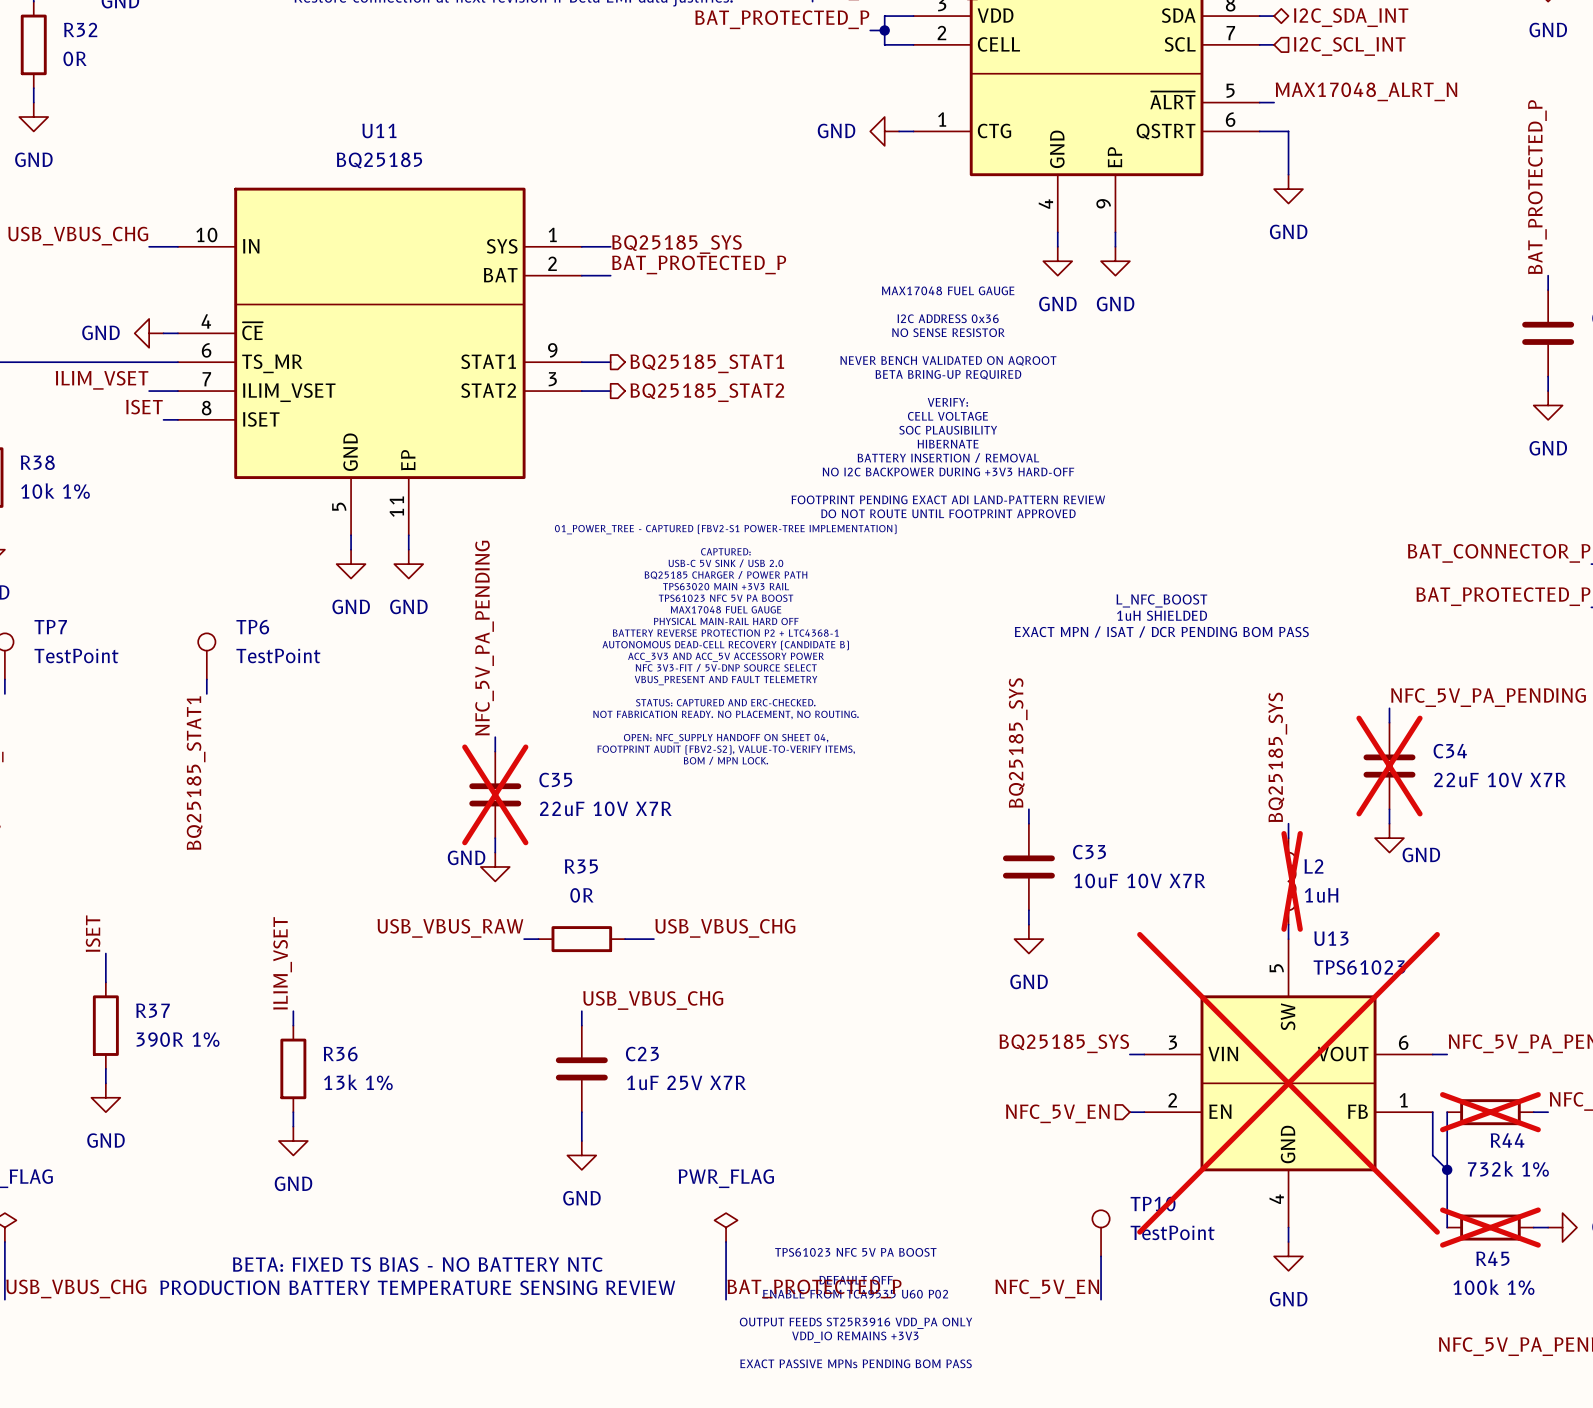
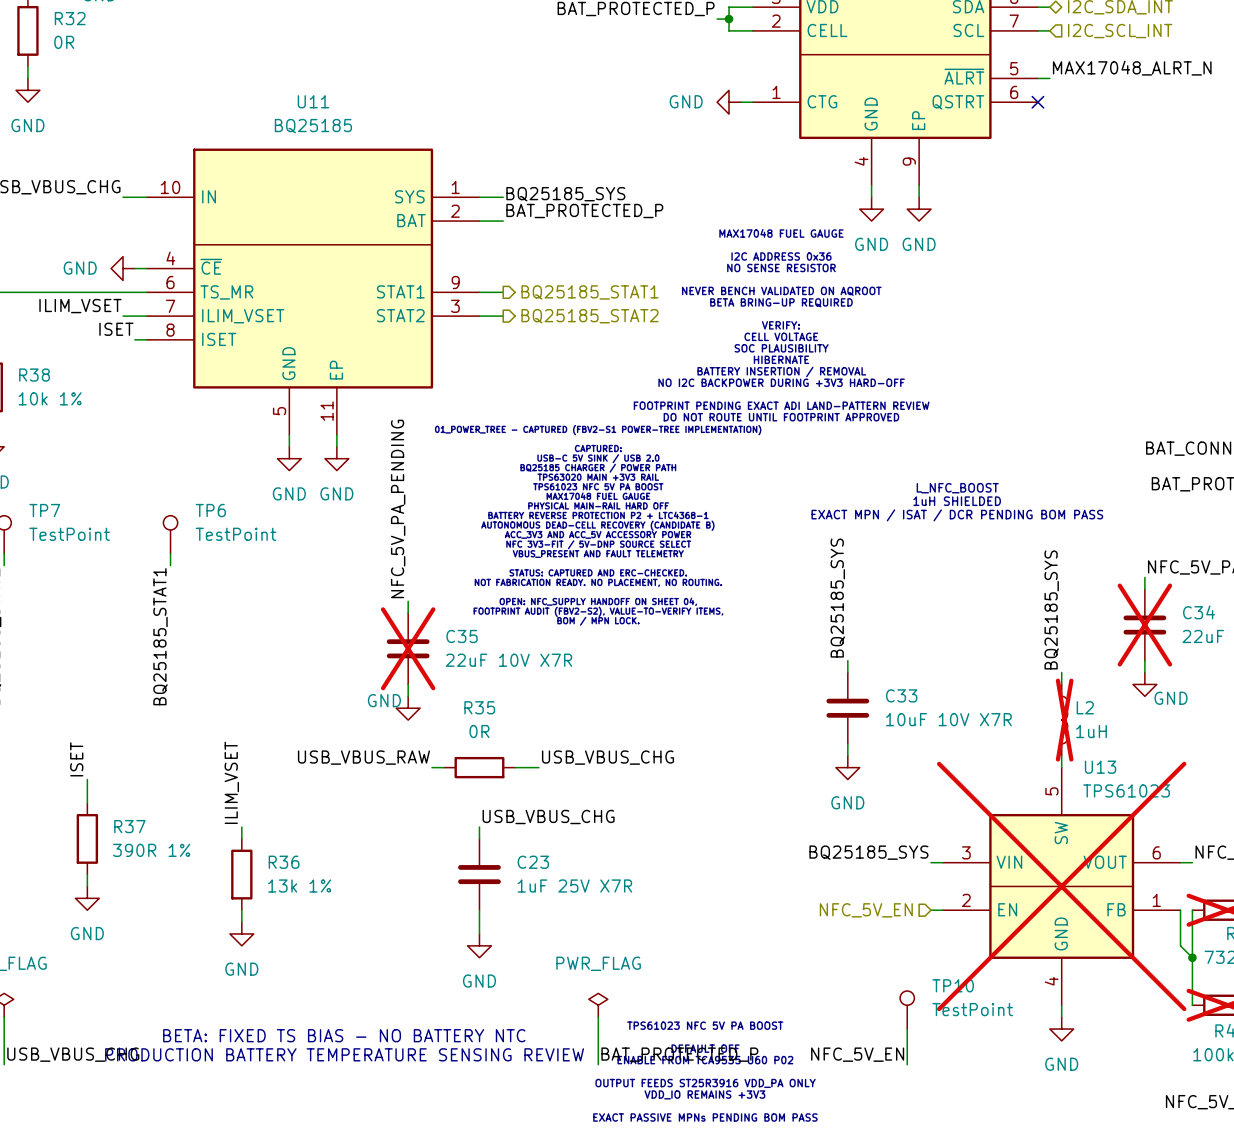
wire: (1259, 131) (1288, 131) (1288, 174) -> none
no-connect mark: none -> (1037, 102)
power symbol: GND (1288, 189) -> none

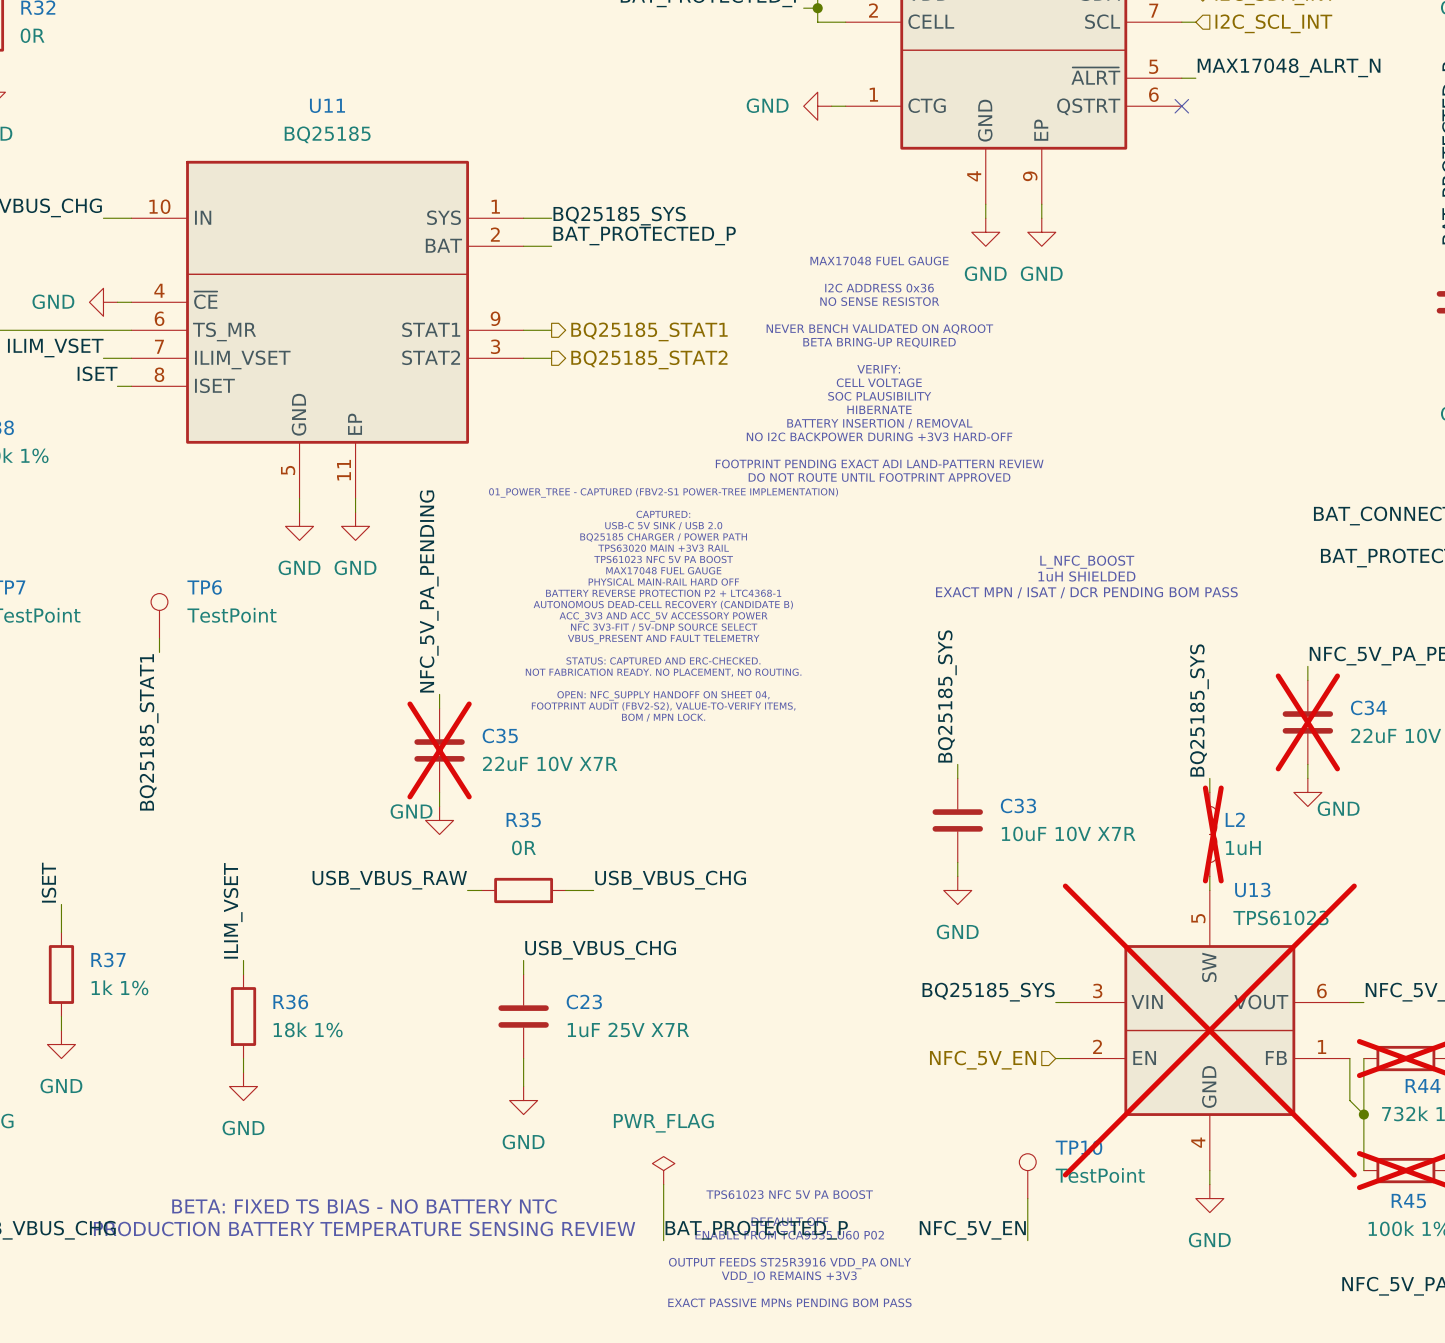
R37 value: 390R 1% (151, 850) -> 1k 1% (119, 987)
R36 value: 13k 1% (299, 886) -> 18k 1% (308, 1029)

